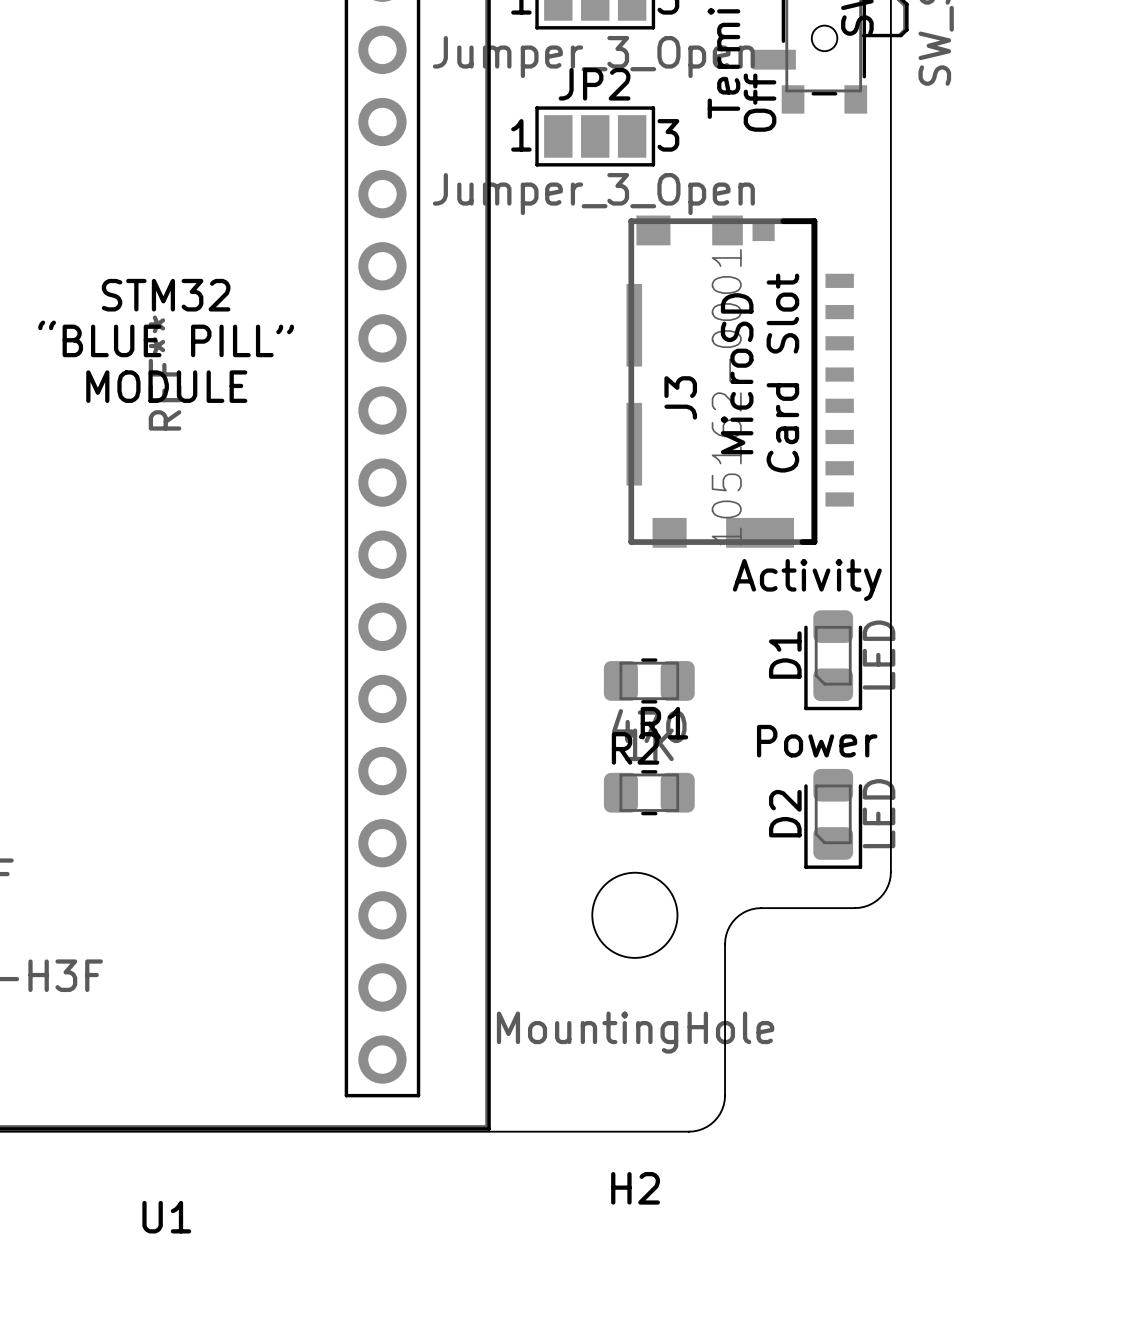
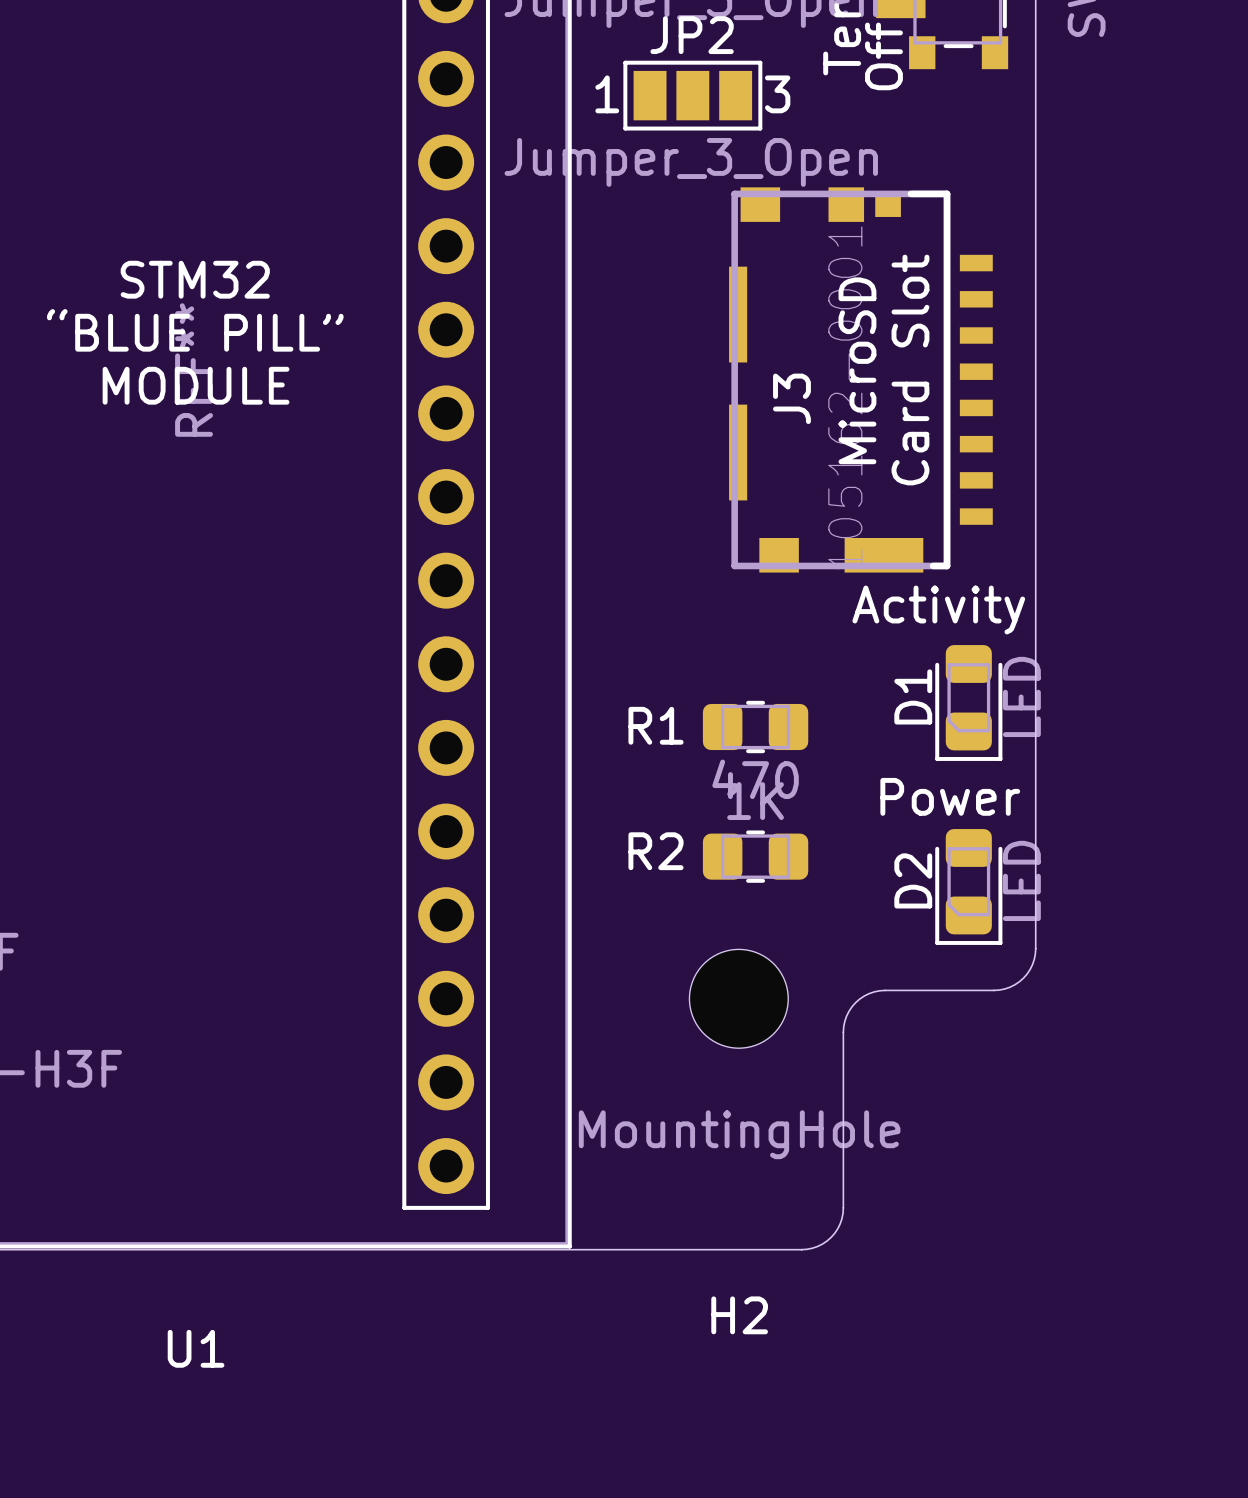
R1 name position: R1 (664, 723) -> R1 (656, 725)
R2 name position: R2 (635, 748) -> R2 (656, 851)

